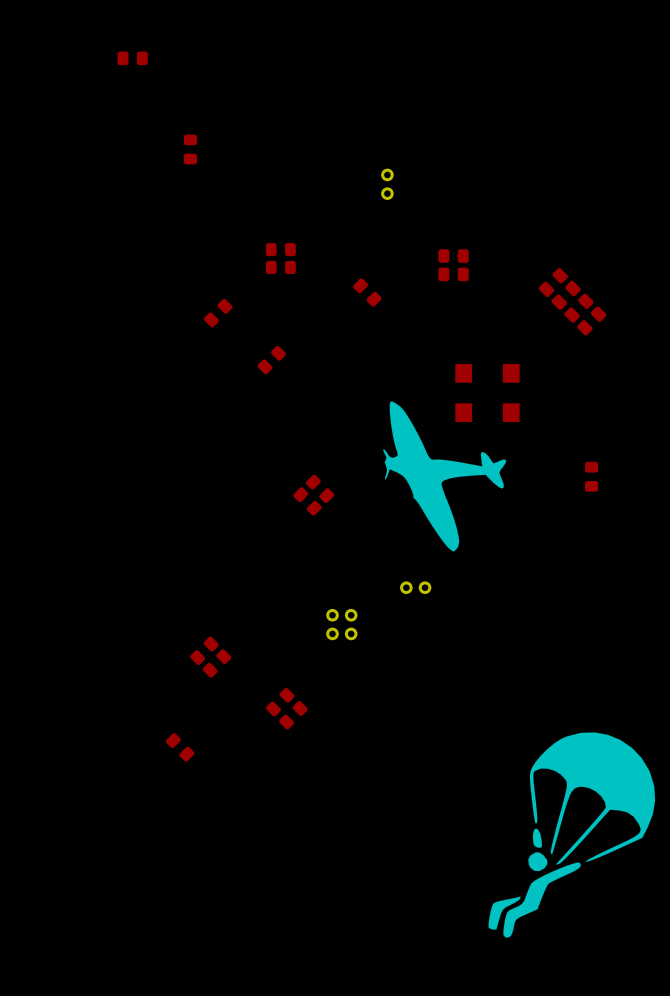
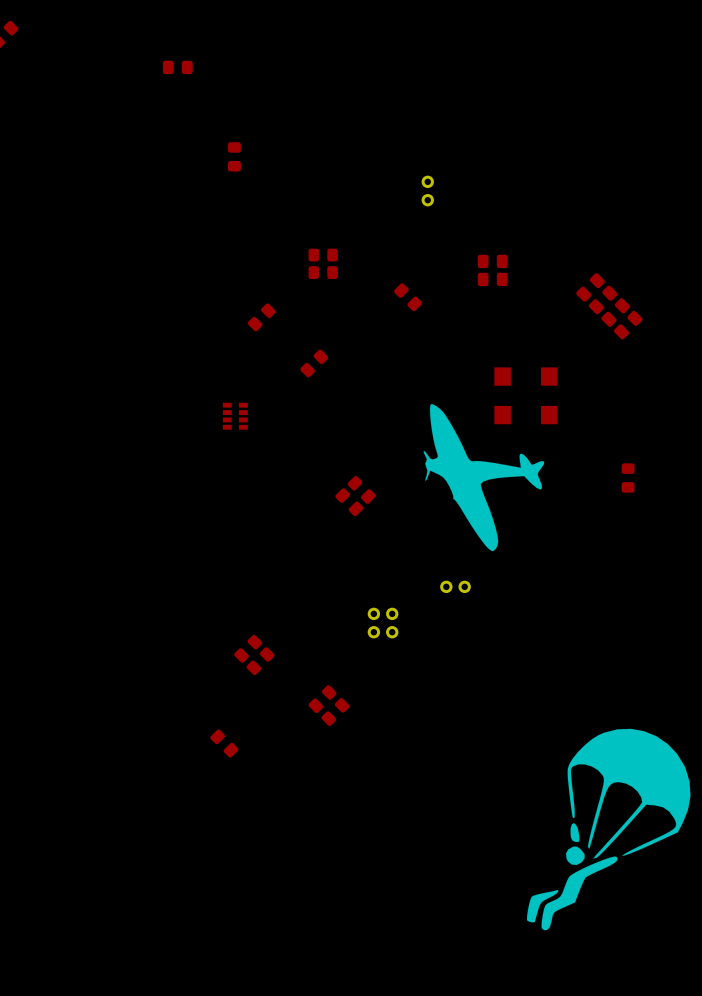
part: none -> (235, 416)

